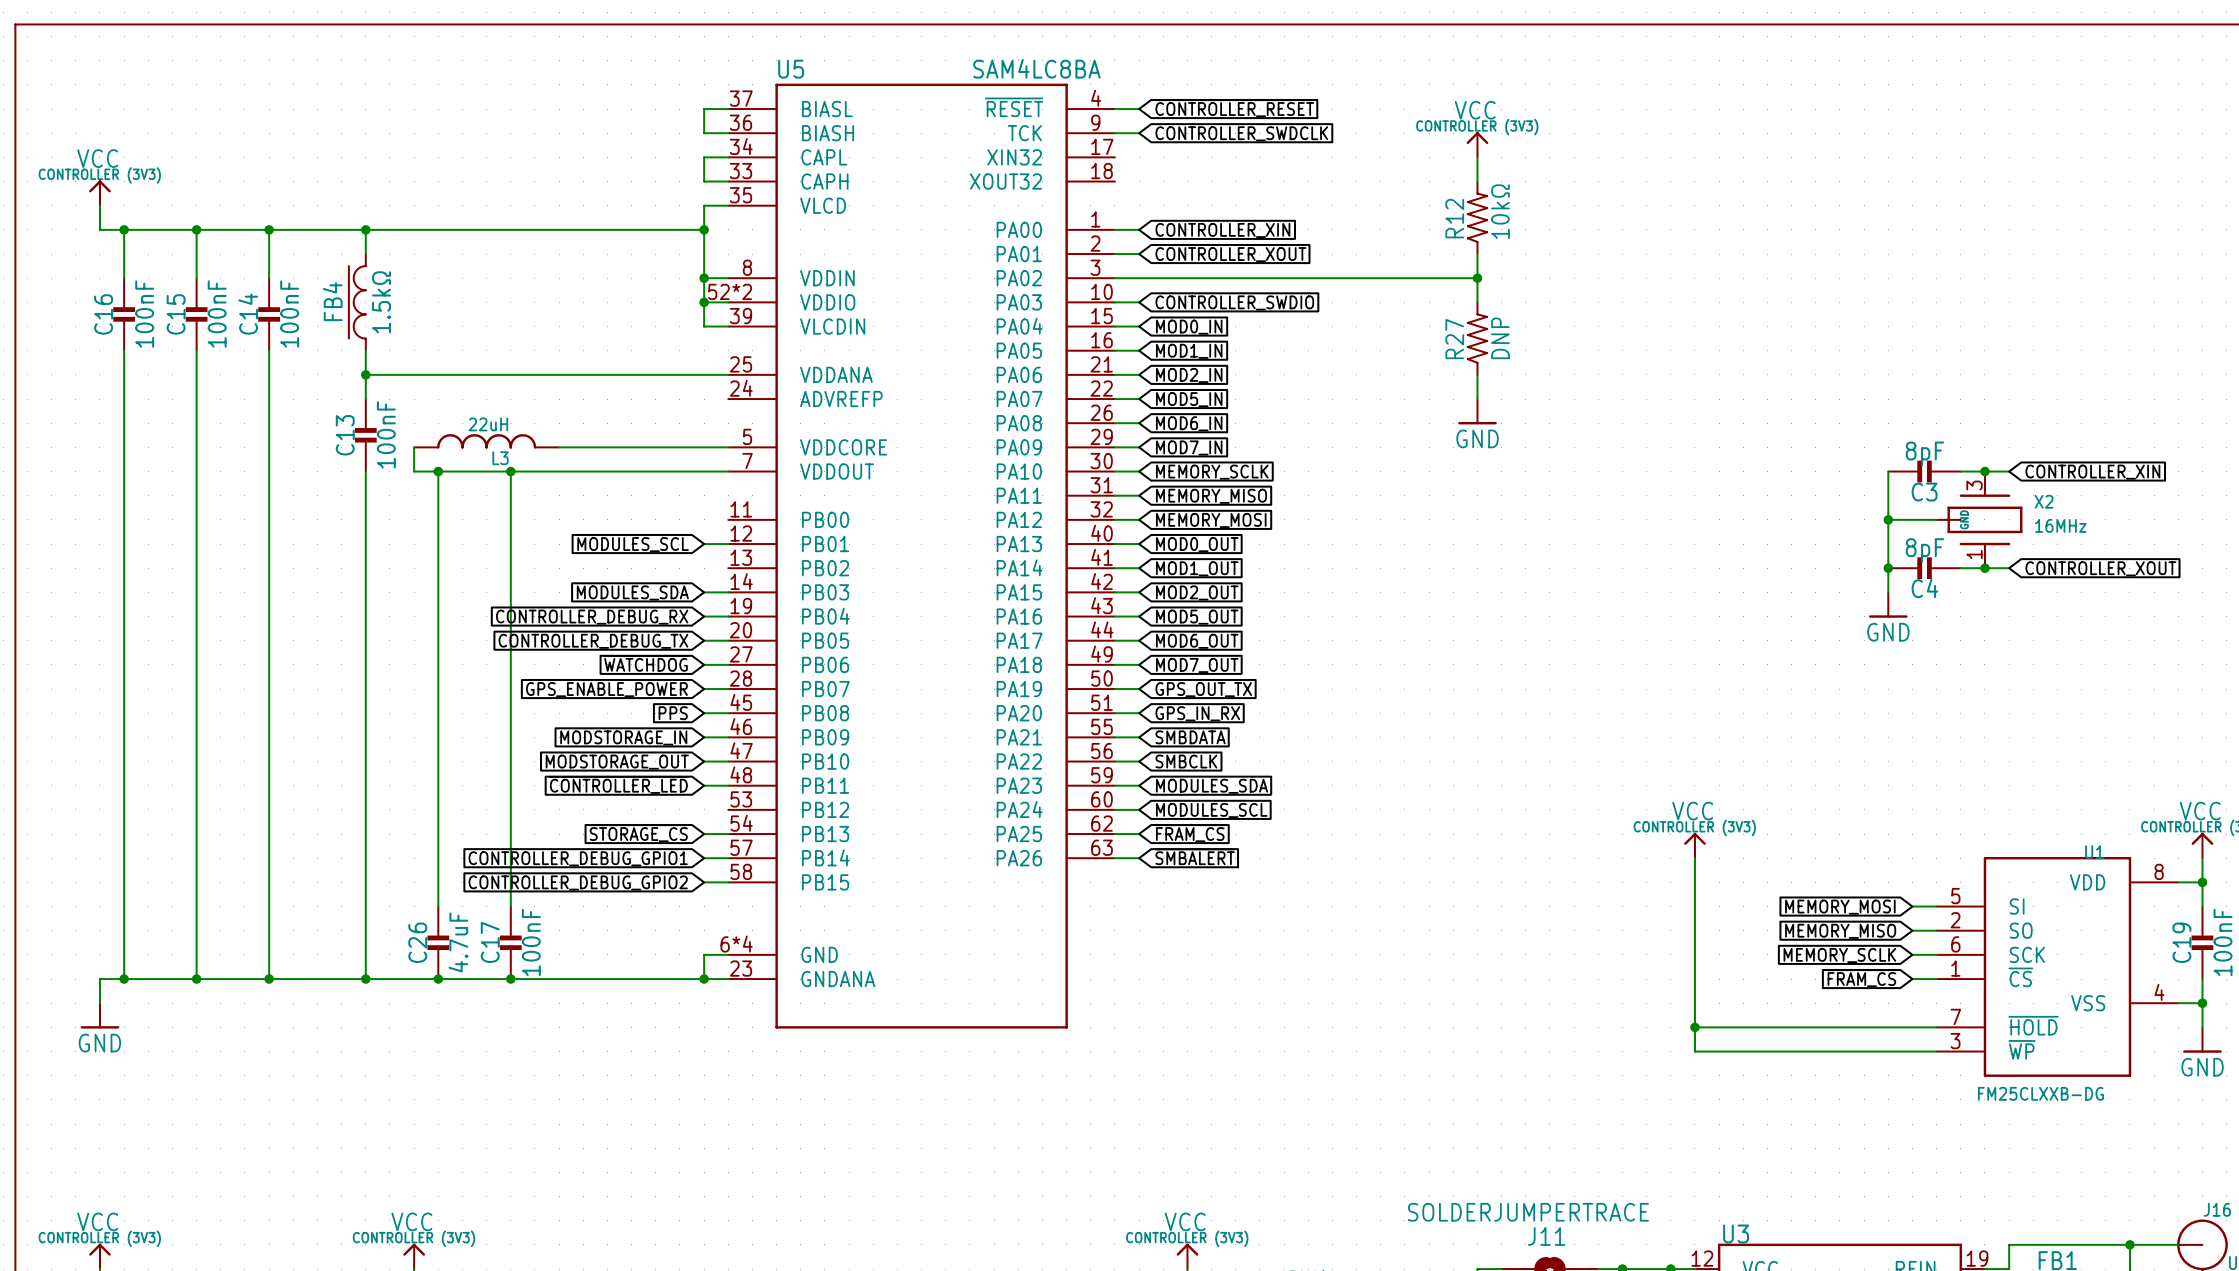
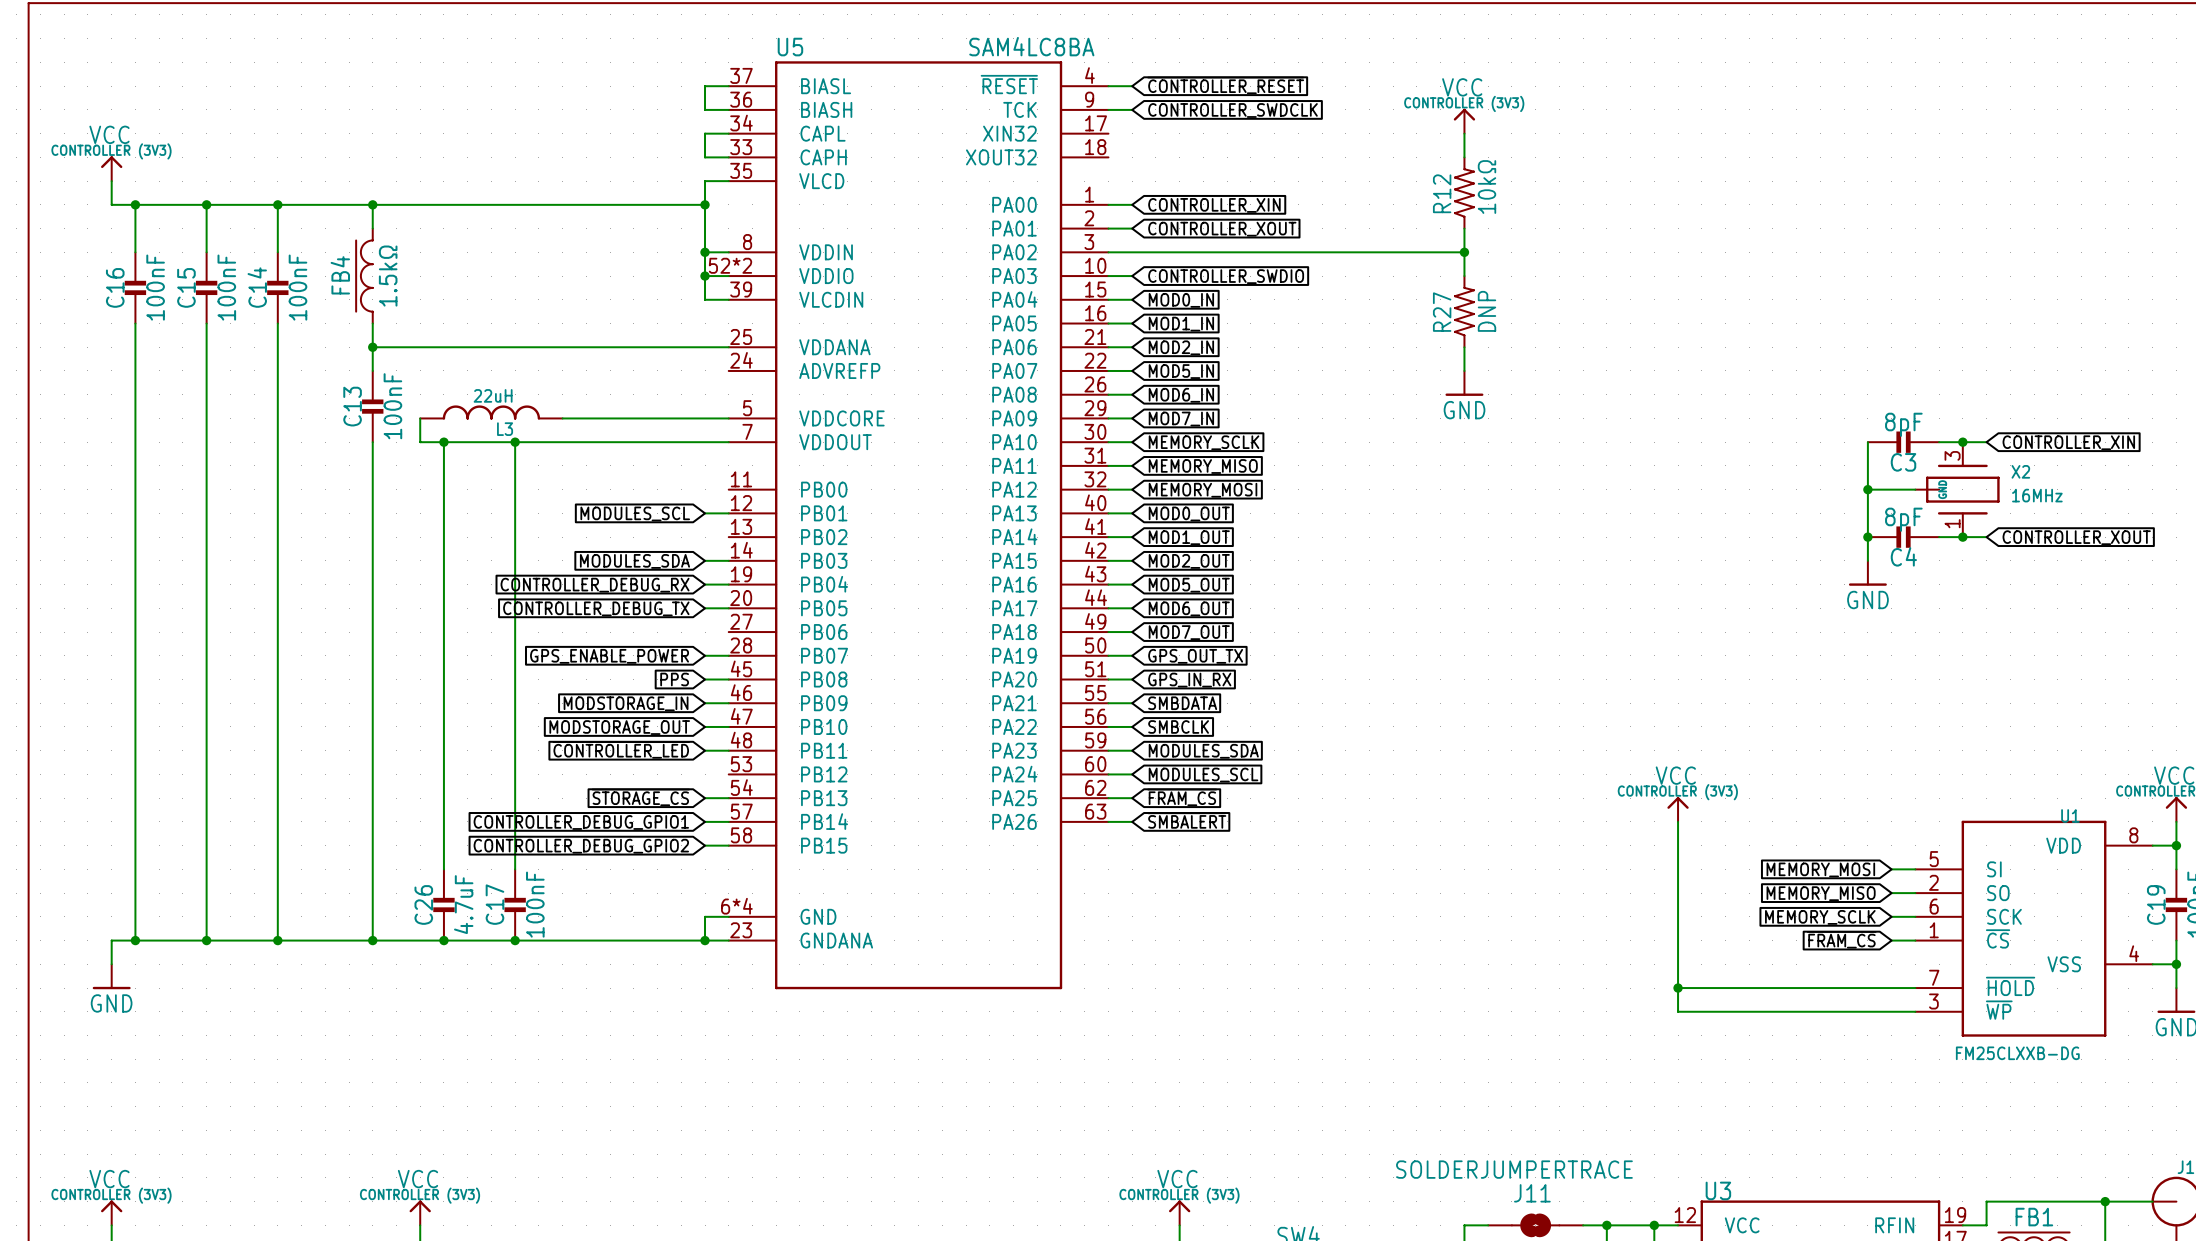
global label: ~{WATCHDOG} (646, 663) -> none
wire: (704, 664) (728, 664) -> none

